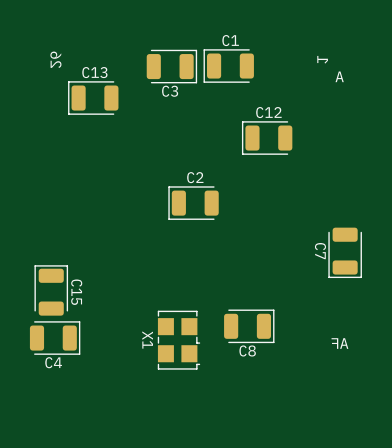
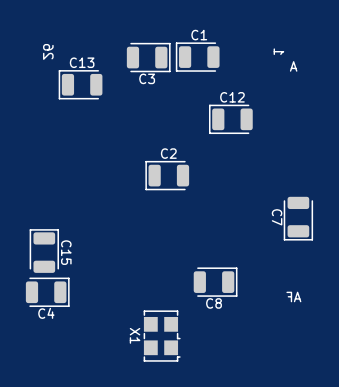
X1 position: (179, 340) -> (162, 336)

